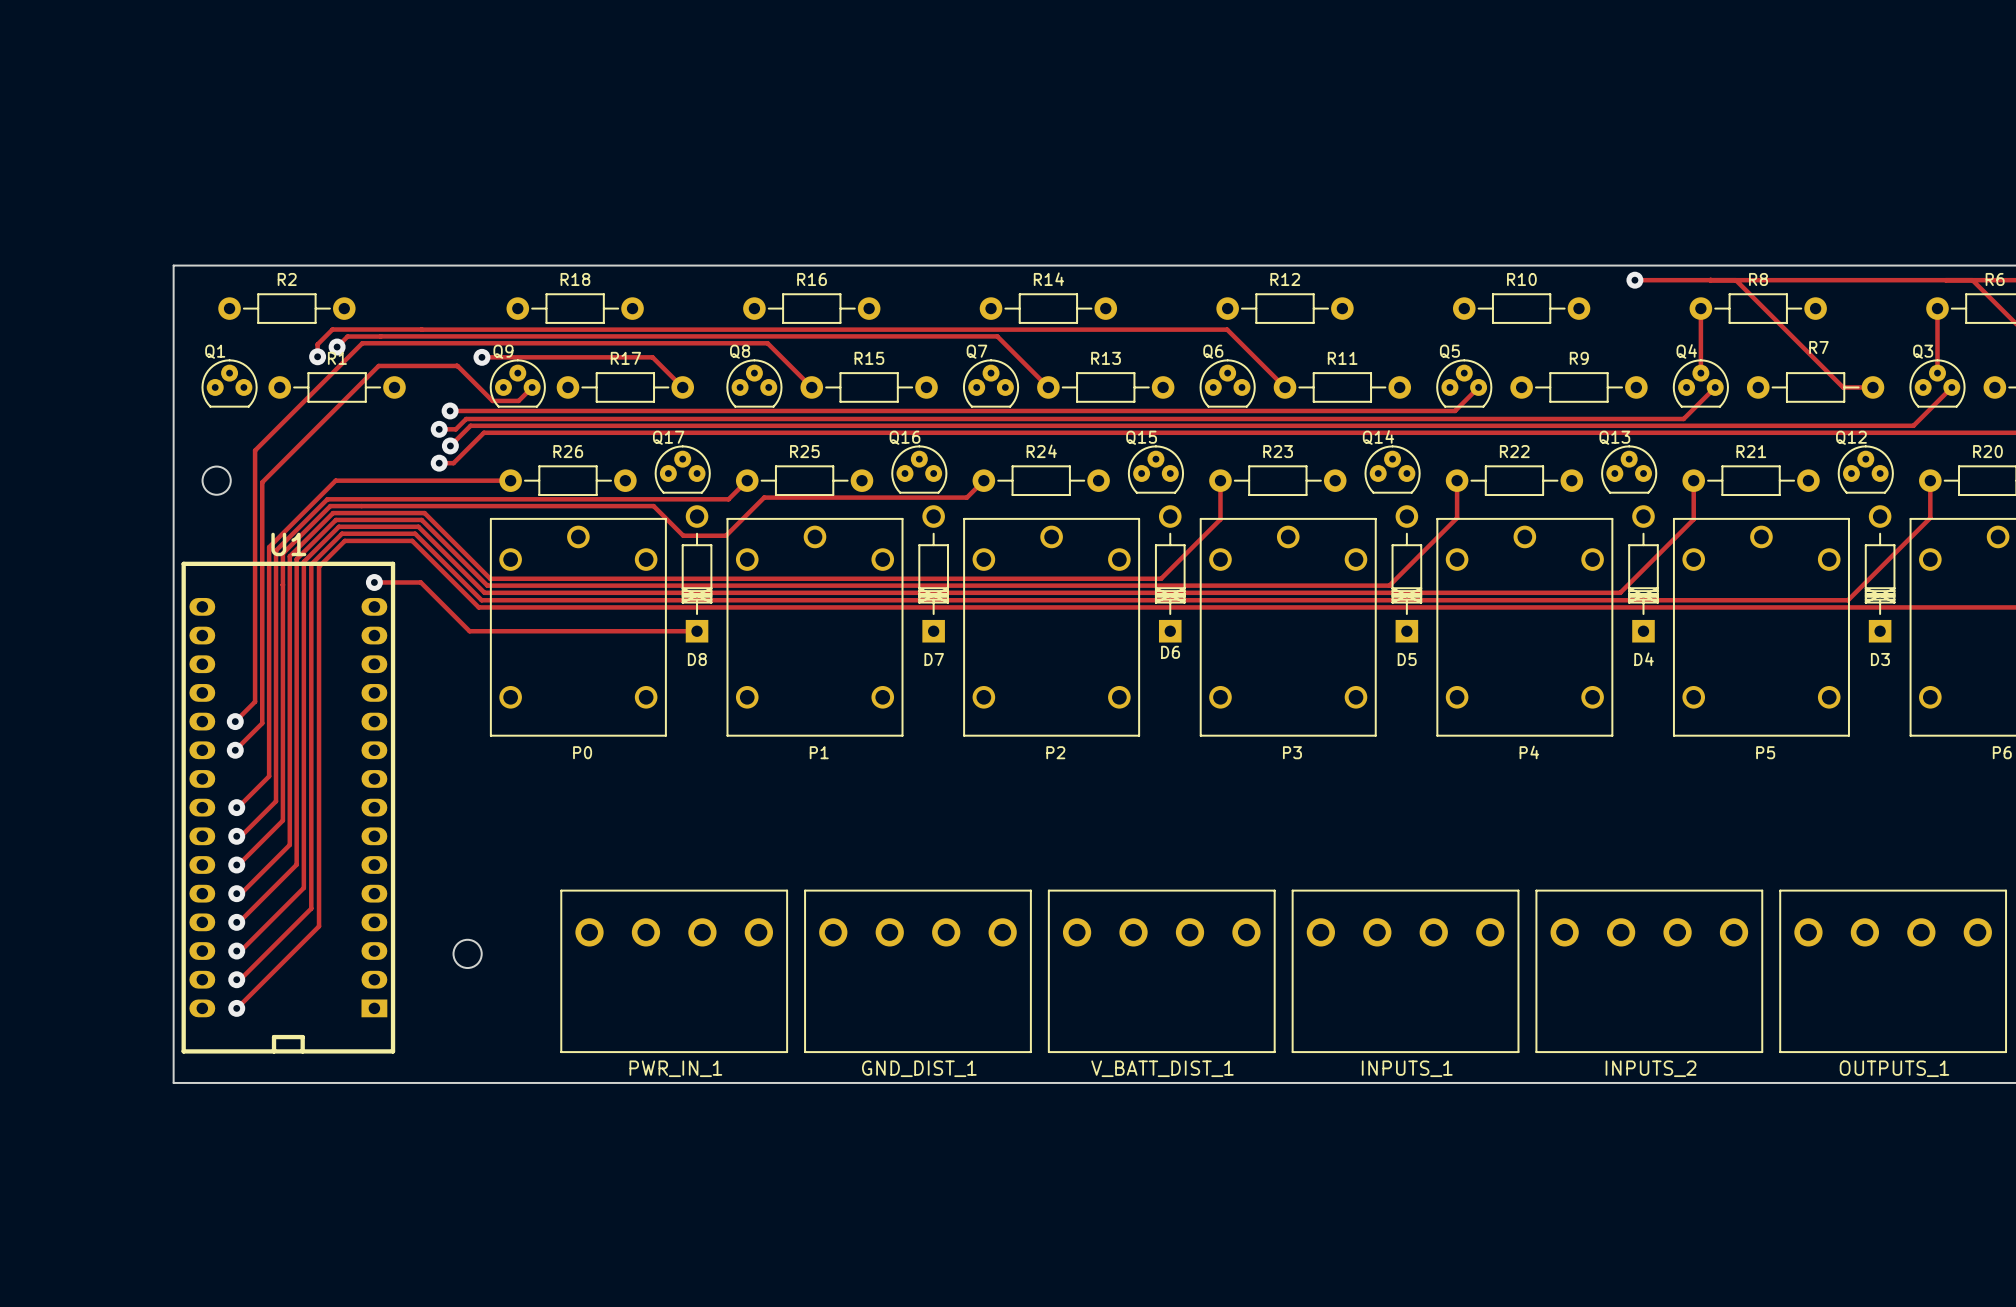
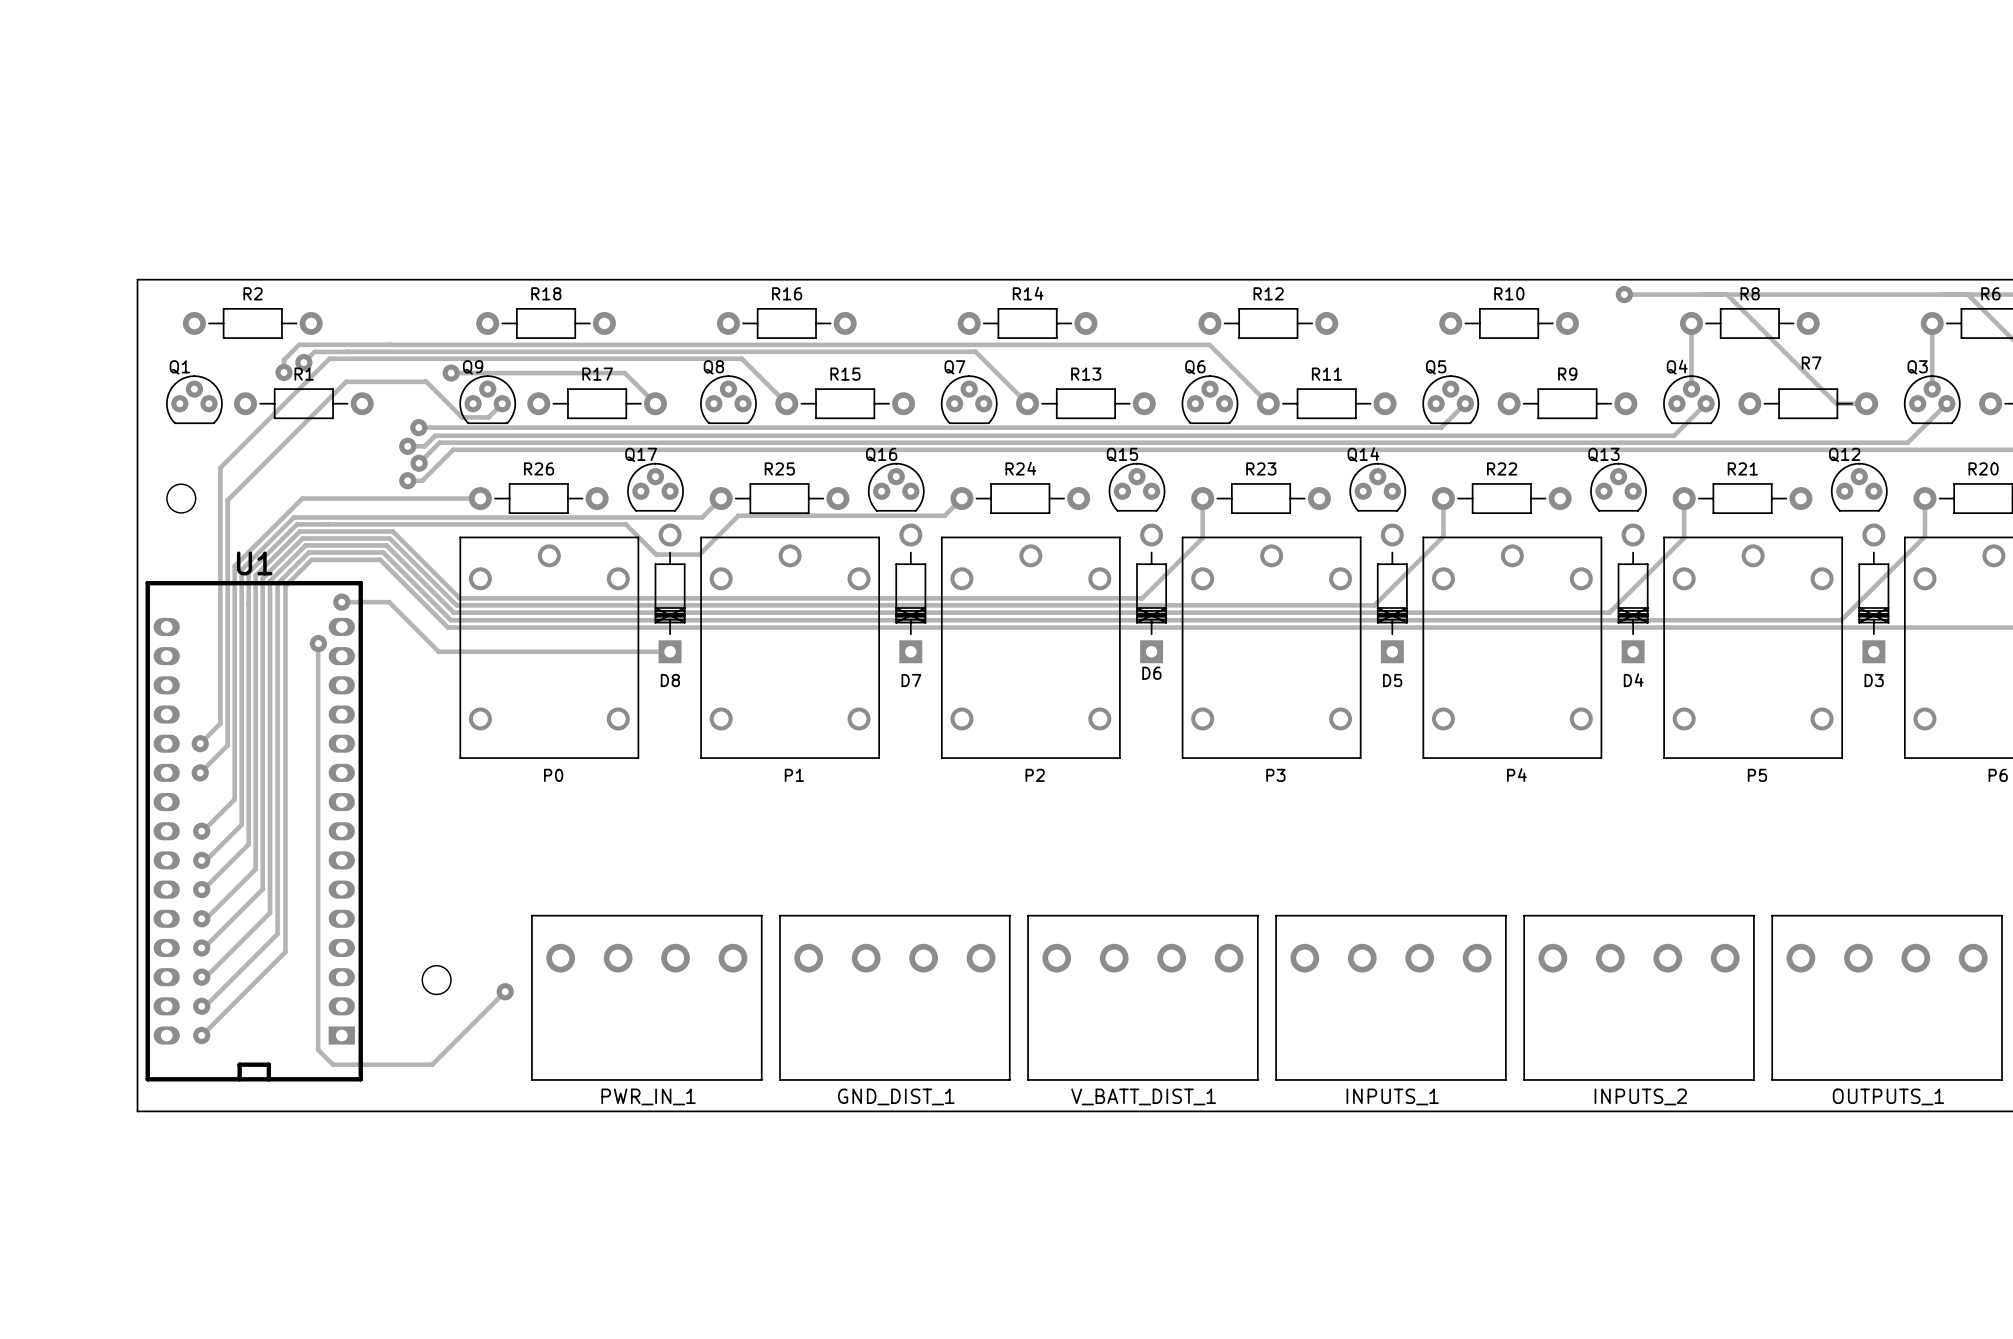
via: none -> (318, 643)
track: none -> (315, 646) (318, 643) (318, 1049) (333, 1064) (432, 1064) (505, 991)
via: none -> (505, 991)

